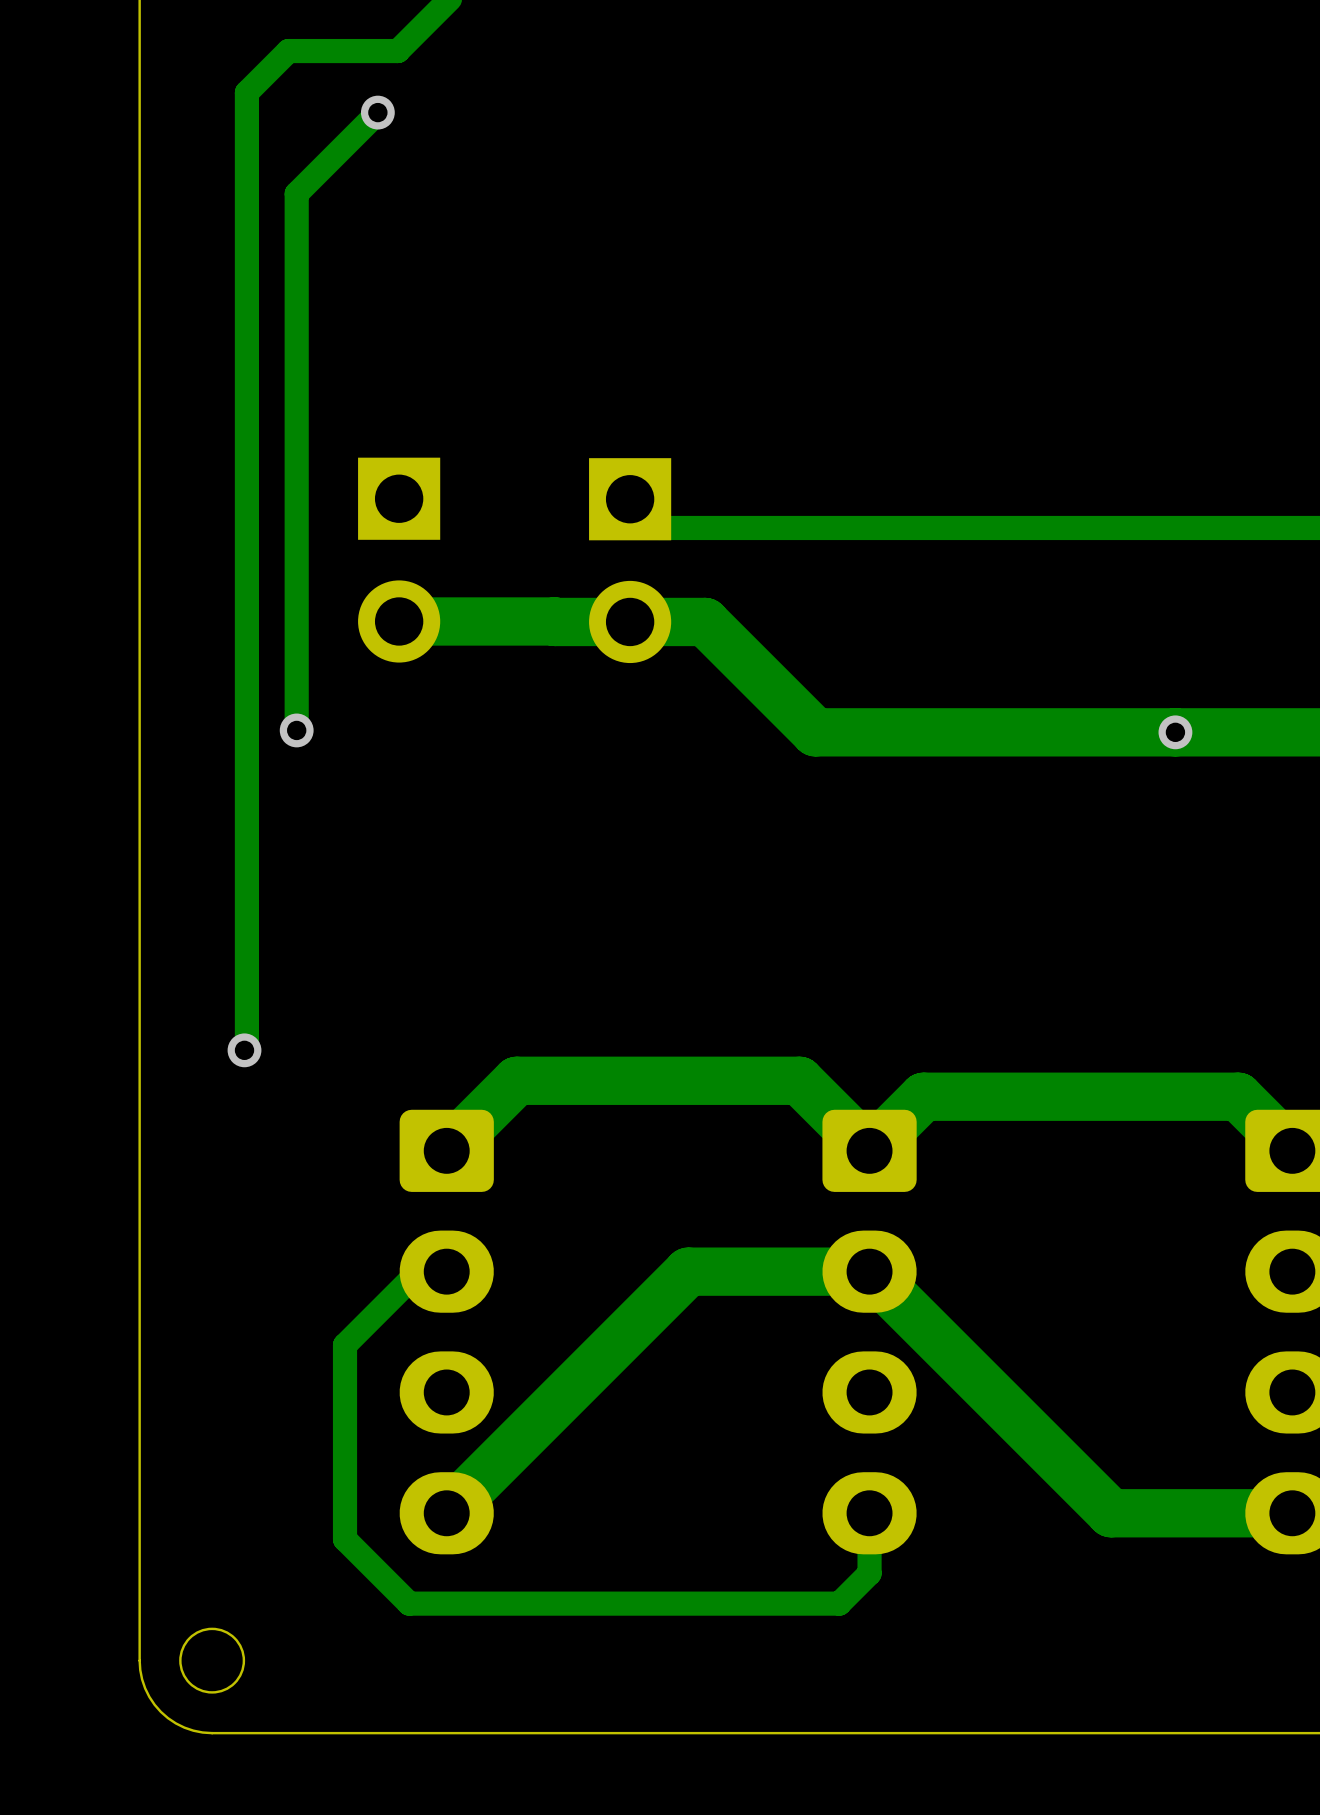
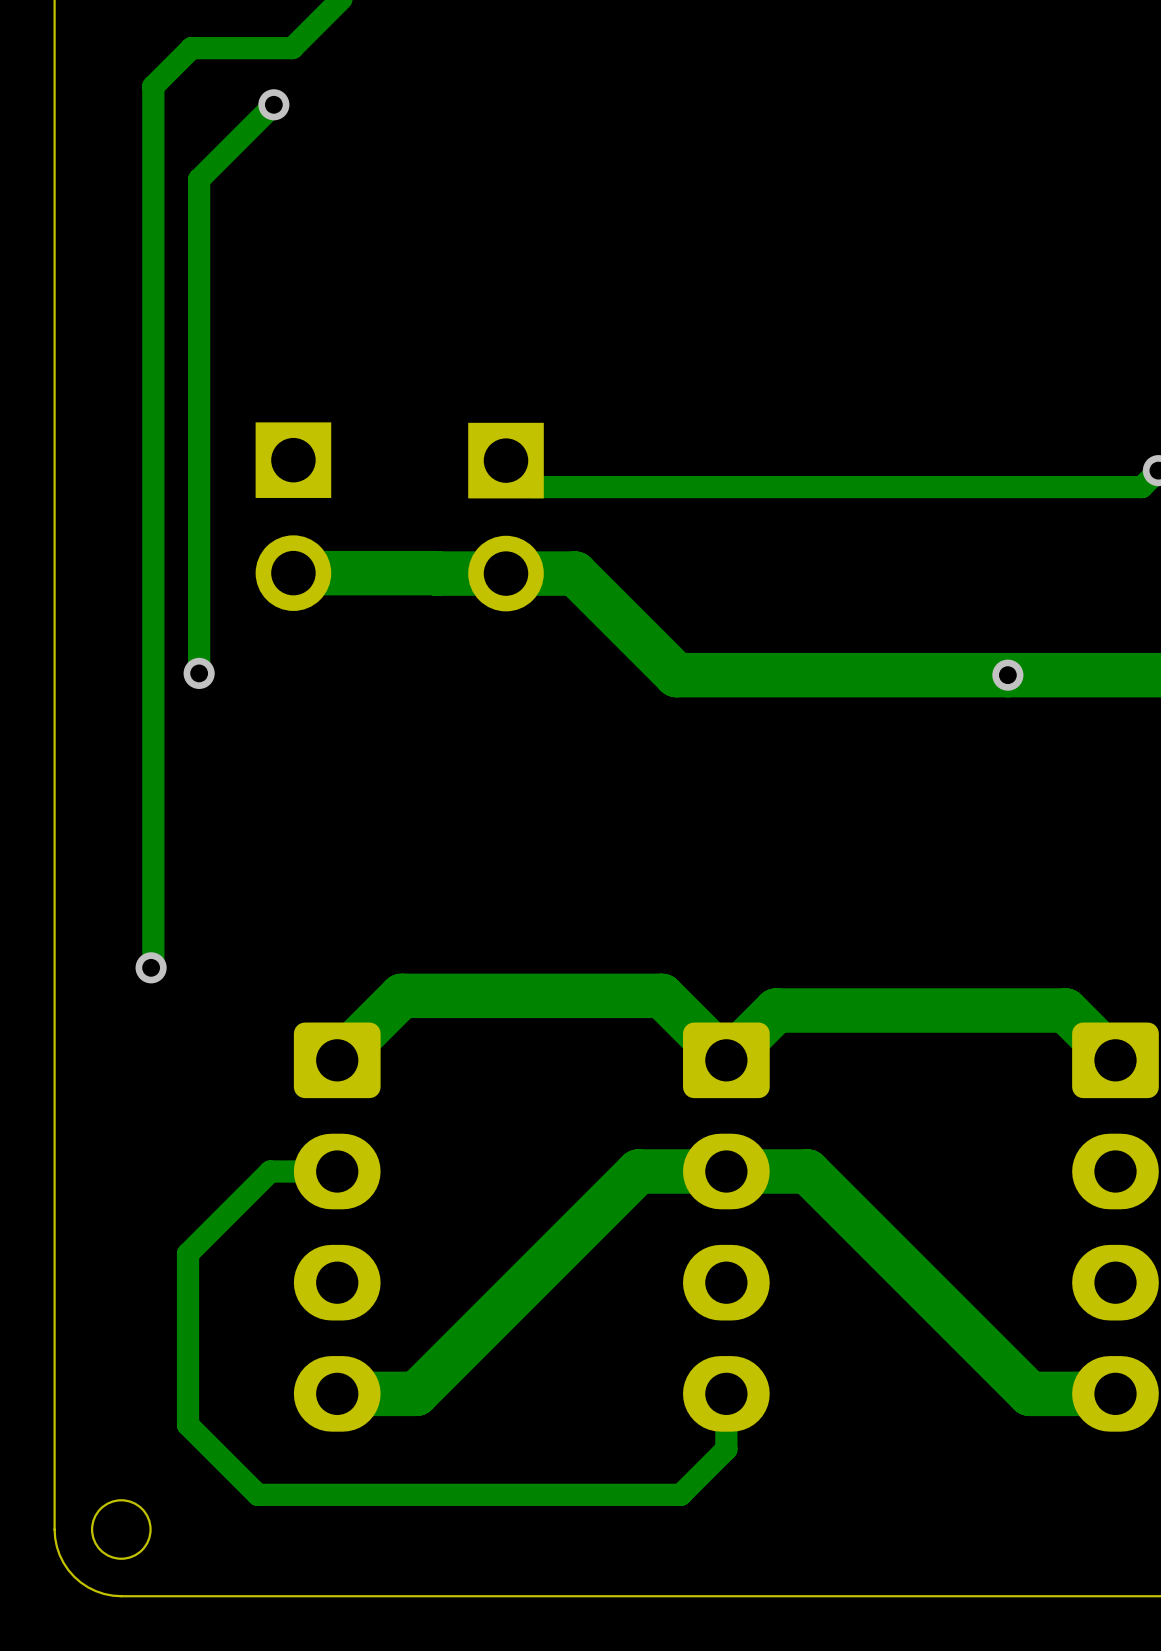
track: (418, 1271) (345, 1345) (345, 1539) (409, 1603) (839, 1603) -> (311, 1171) (270, 1171) (188, 1253) (188, 1425) (257, 1494) (680, 1494) (698, 1477)
track: (774, 1271) (688, 1271) (446, 1513) -> (638, 1171) (416, 1393) (337, 1393)
track: (869, 1271) (1111, 1513) (1199, 1513) -> (726, 1171) (807, 1171) (1029, 1393)

